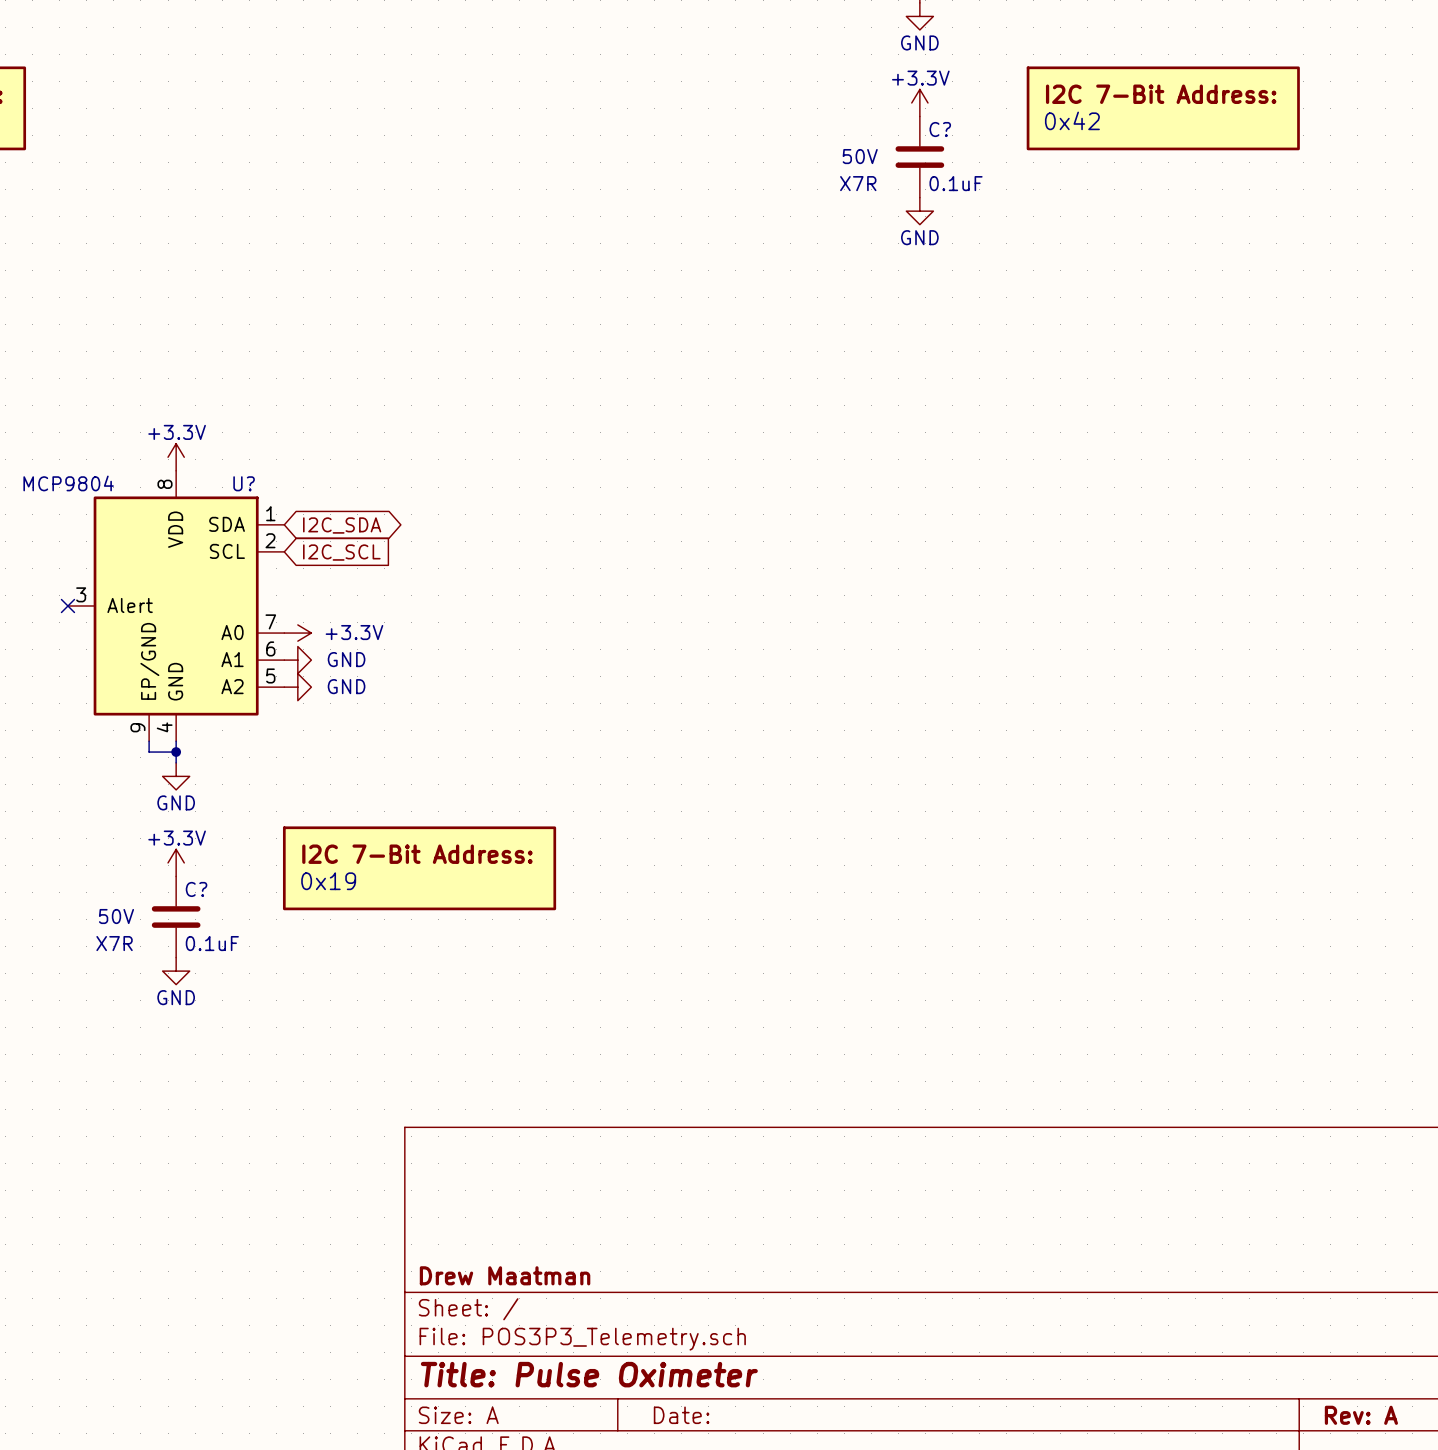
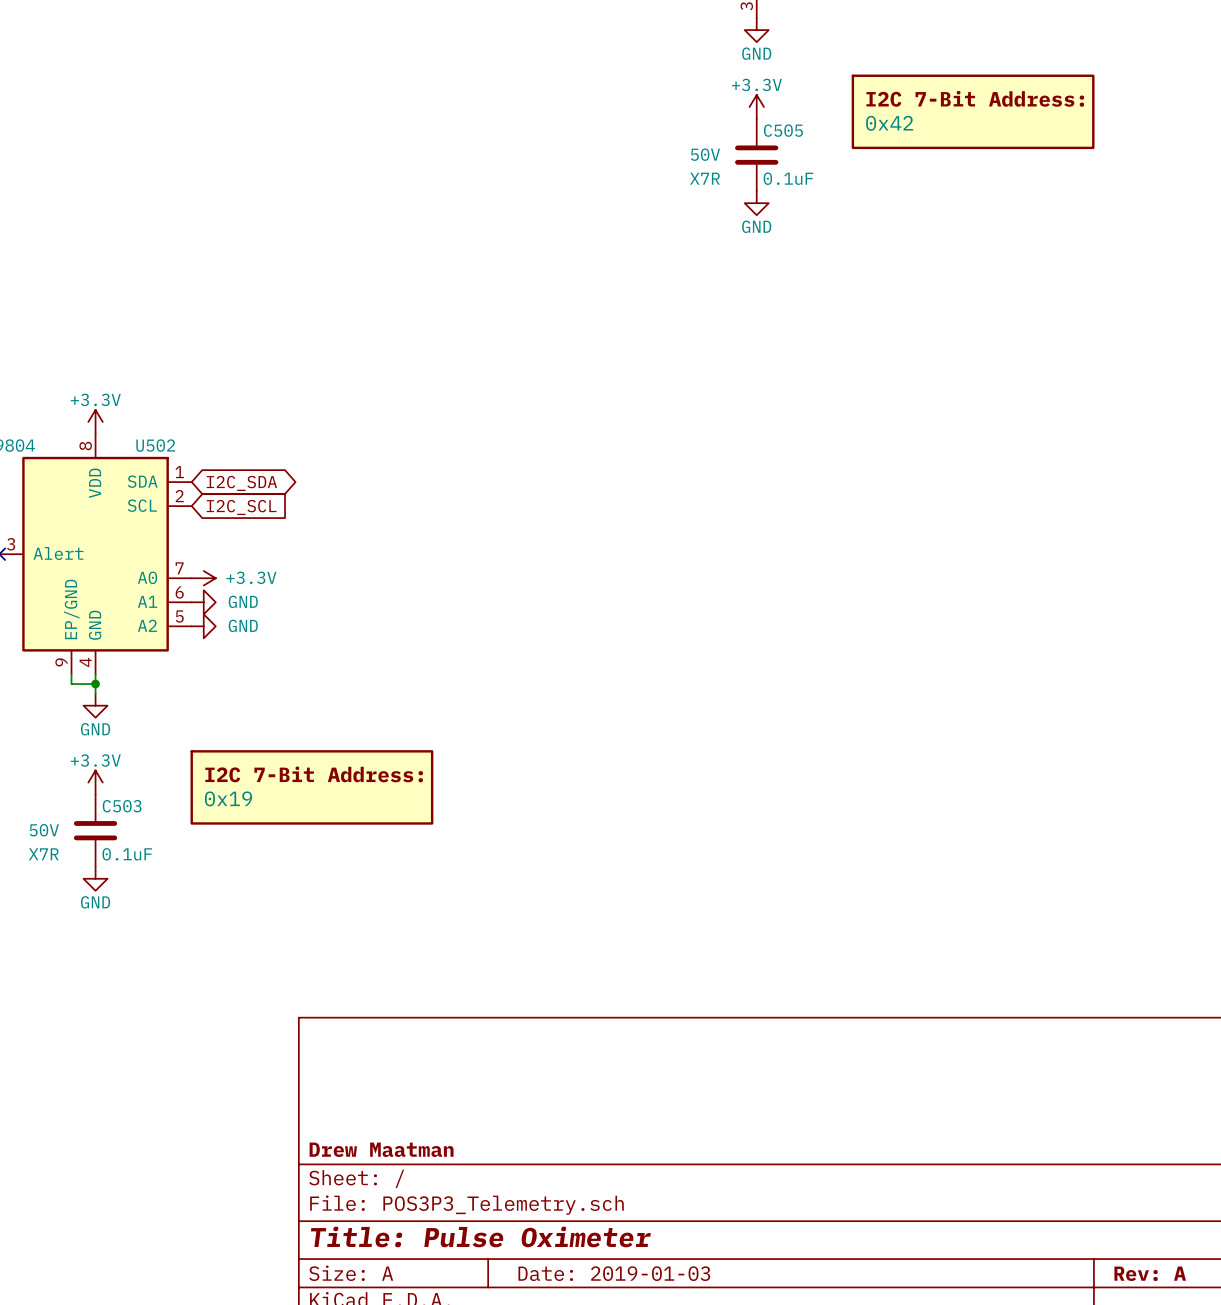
C? name: C? (940, 129) -> C505 (783, 130)
U? name: U? (244, 483) -> U502 (155, 445)
C? name: C? (196, 889) -> C503 (122, 806)
title block: Date: (681, 1415) -> Date: 2019-01-03 (614, 1273)

